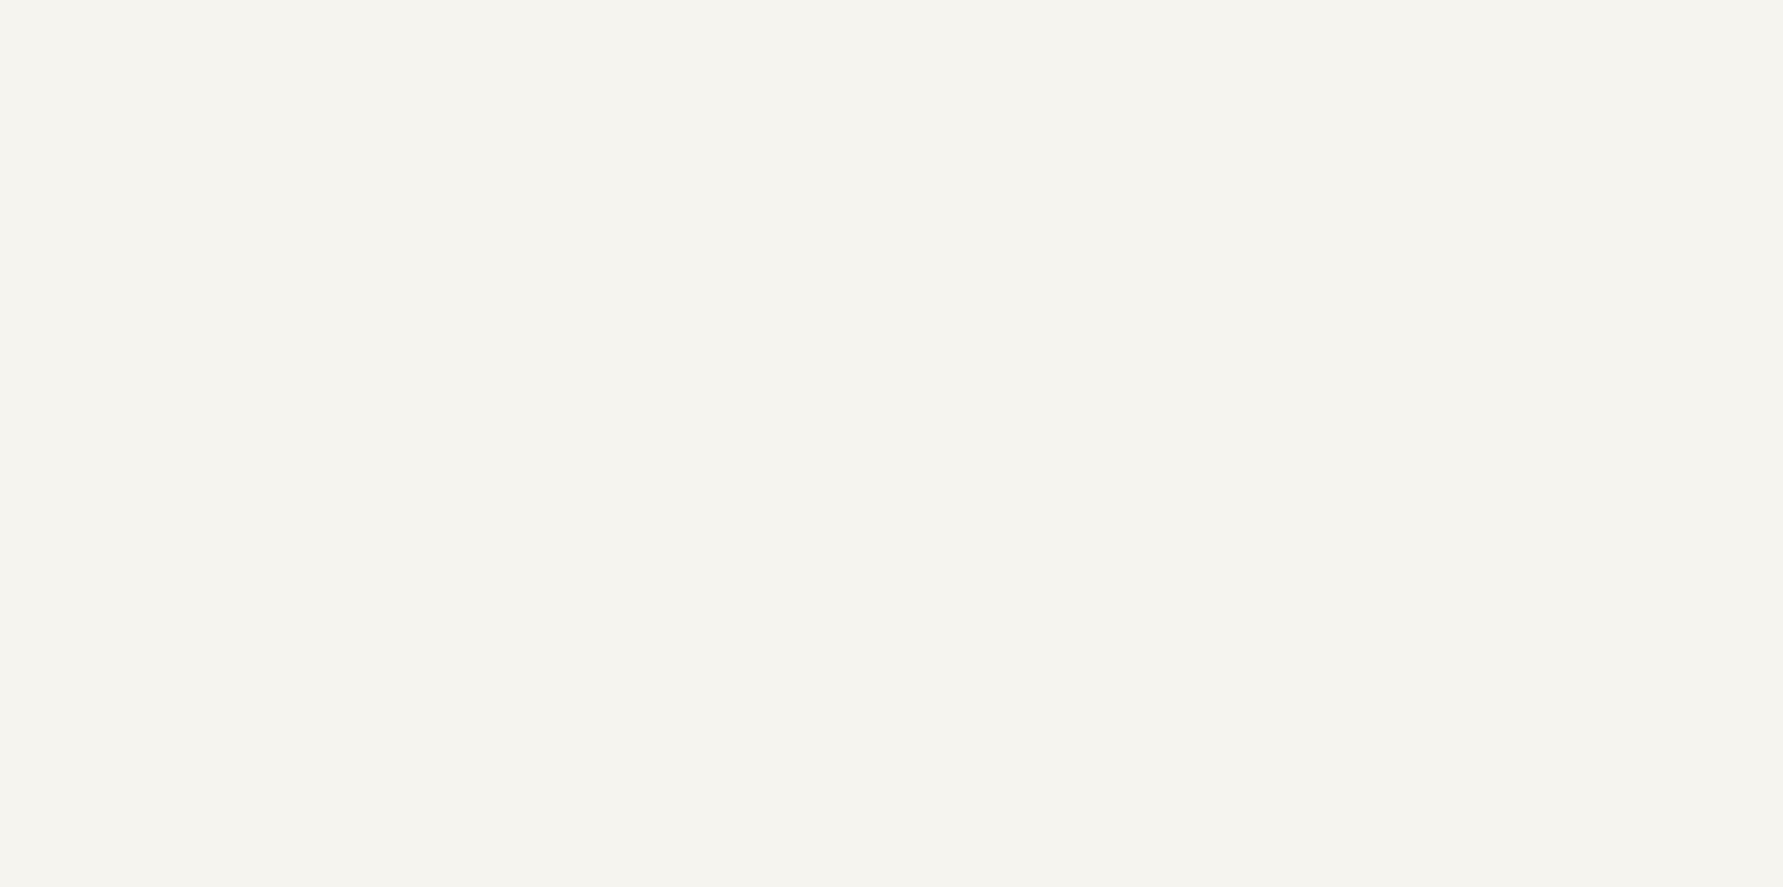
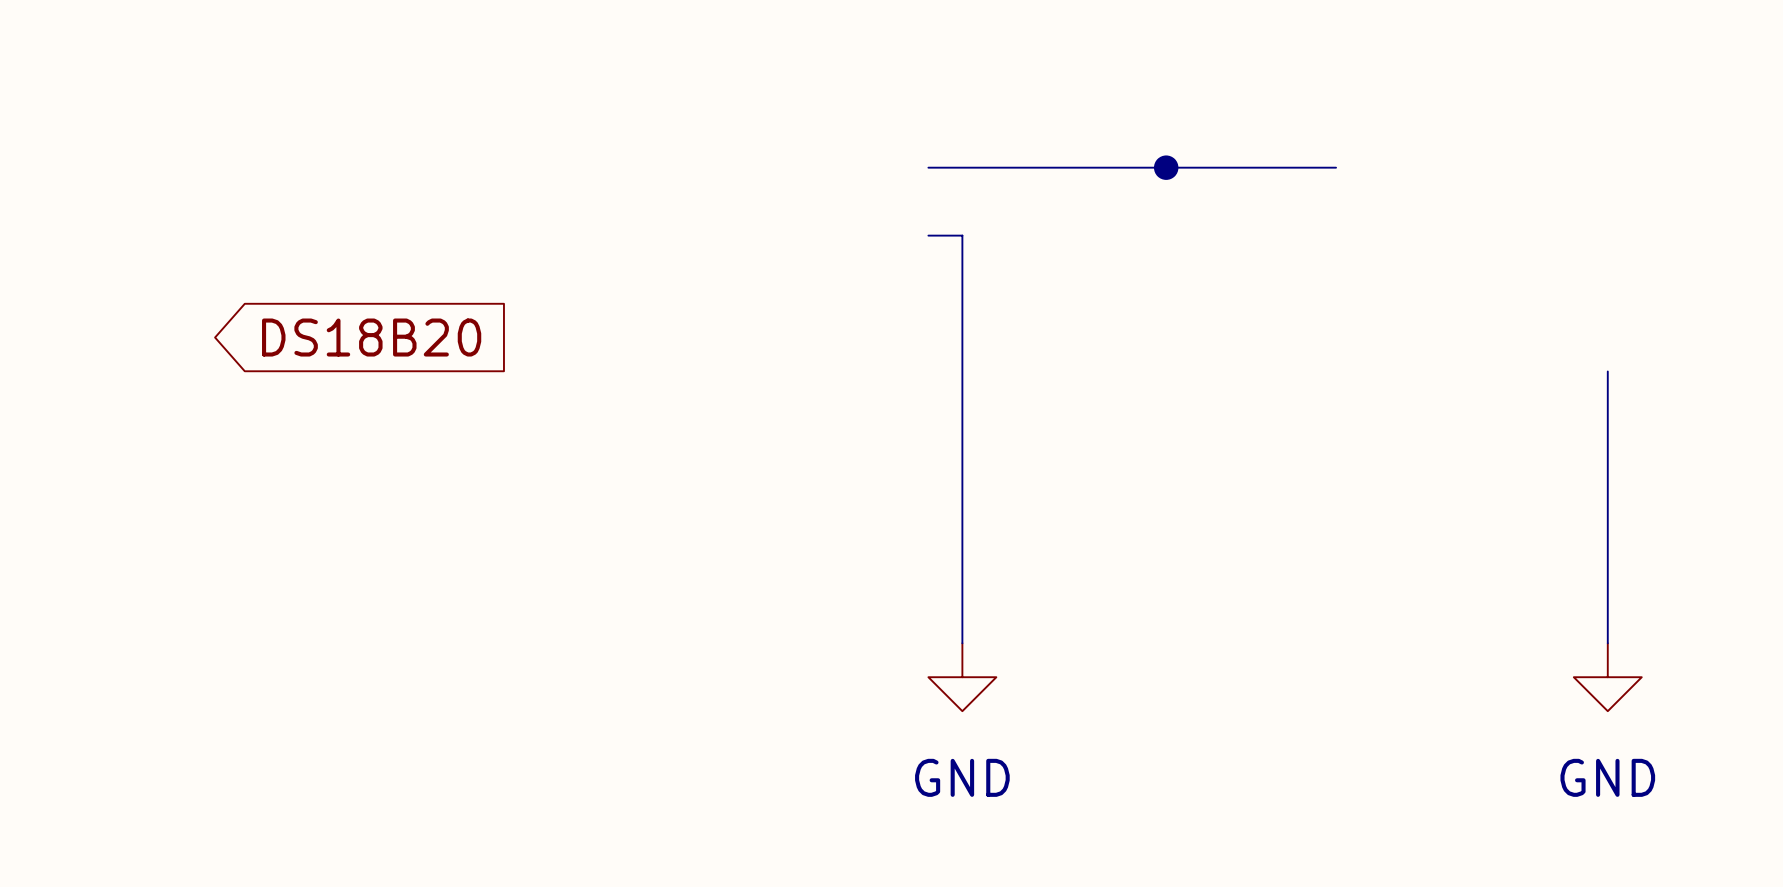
wire: none -> (928, 167) (1336, 167)
junction: none -> (1166, 167)
wire: none -> (928, 235) (962, 235) (962, 643)
global label: none -> DS18B20 (371, 337)
wire: none -> (1607, 371) (1607, 643)
power symbol: none -> GND (962, 677)
power symbol: none -> GND (1607, 677)

